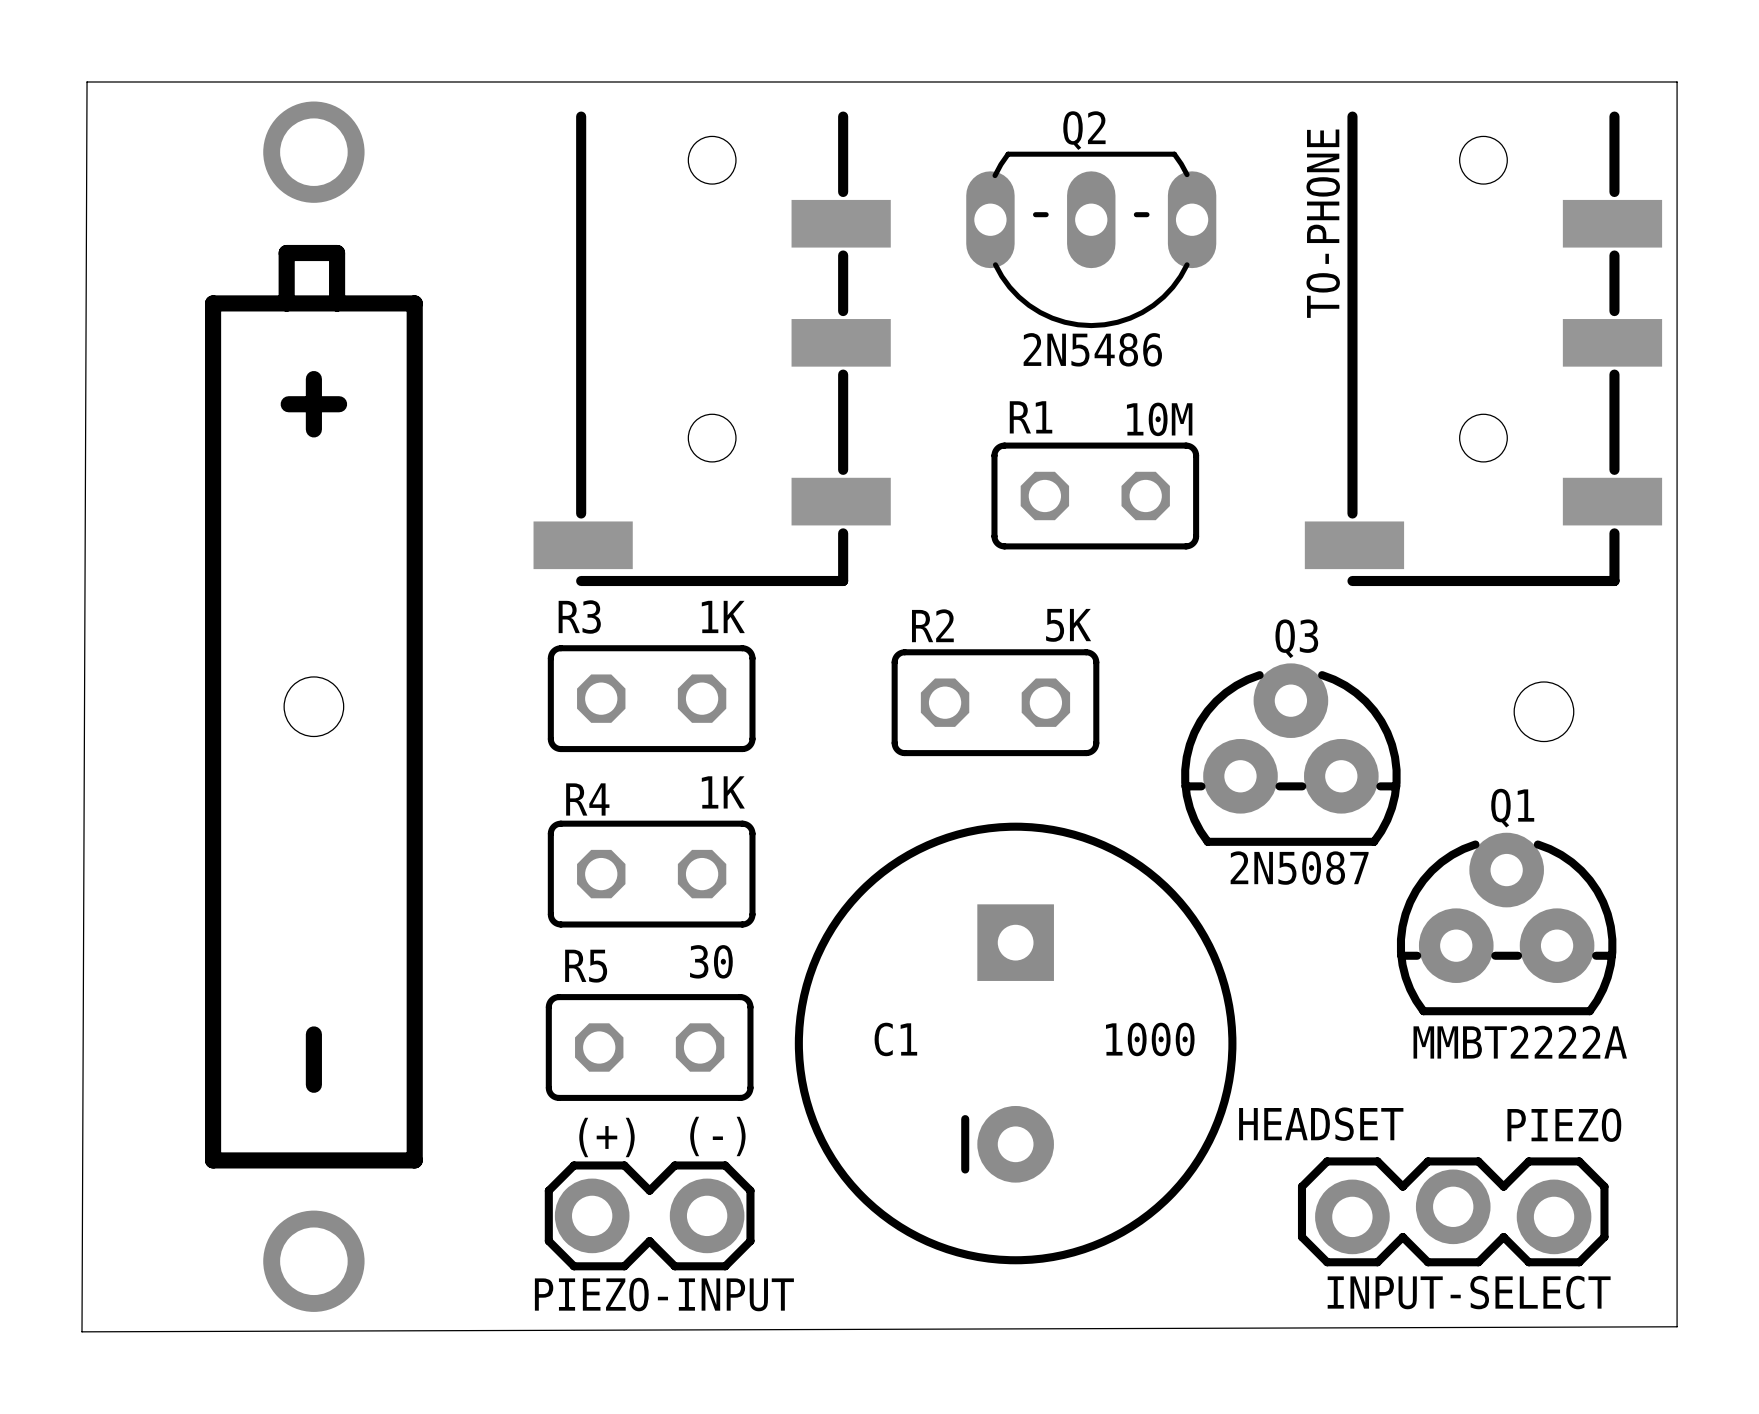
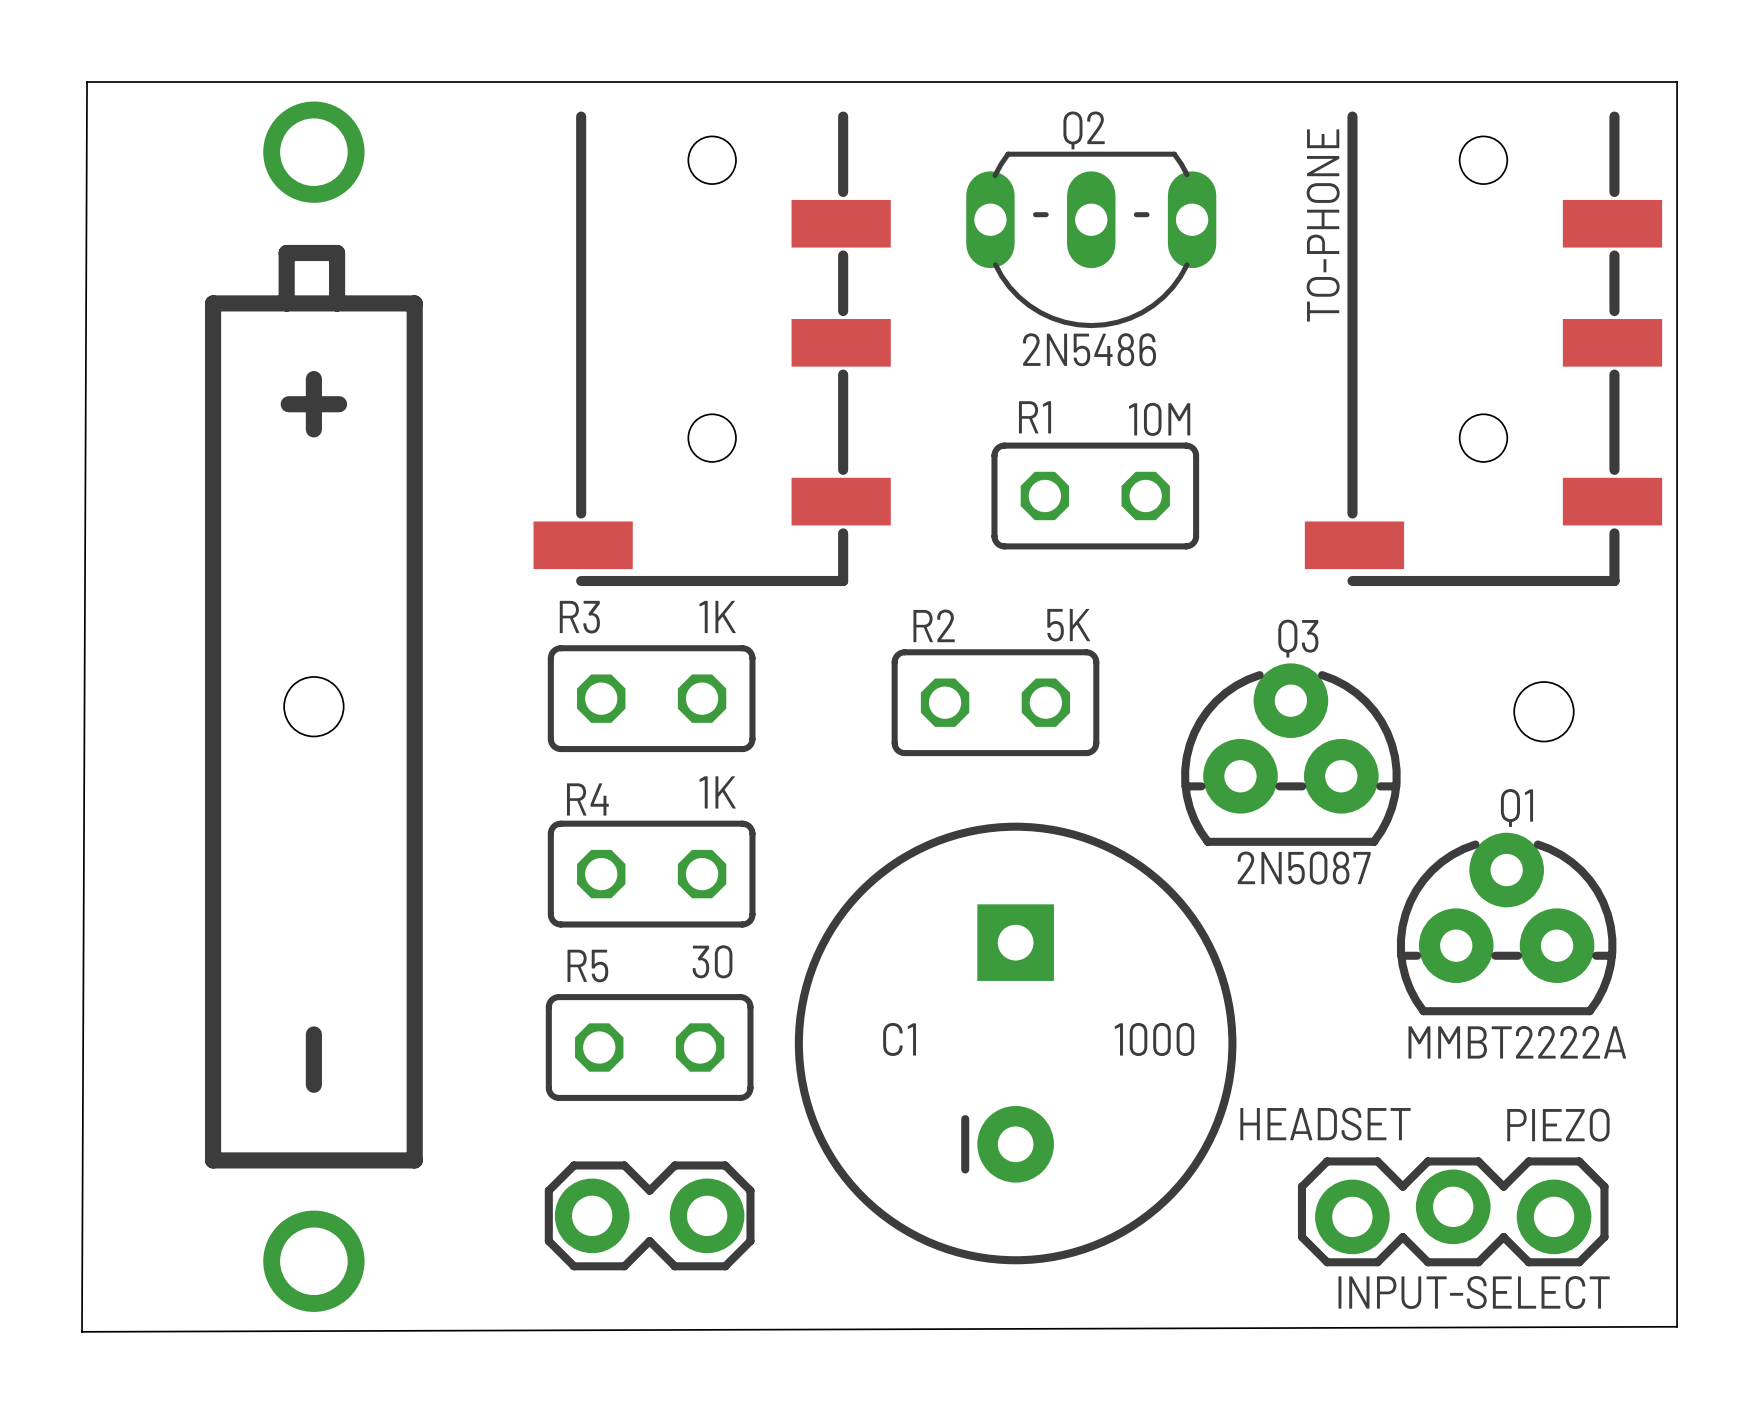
part text: (-) (717, 1136) -> none
part text: (+) (606, 1137) -> none
part text: PIEZO-INPUT (664, 1294) -> none

